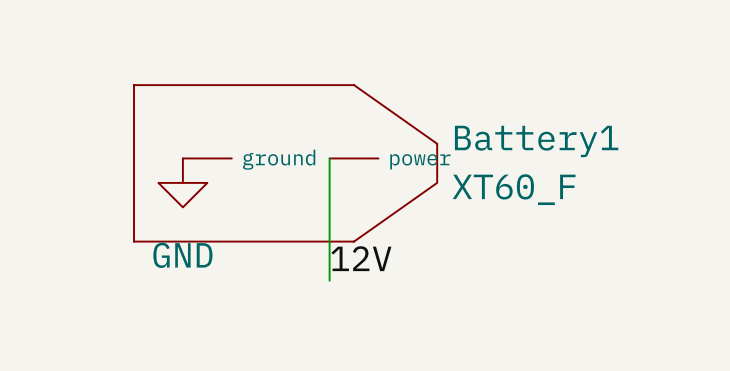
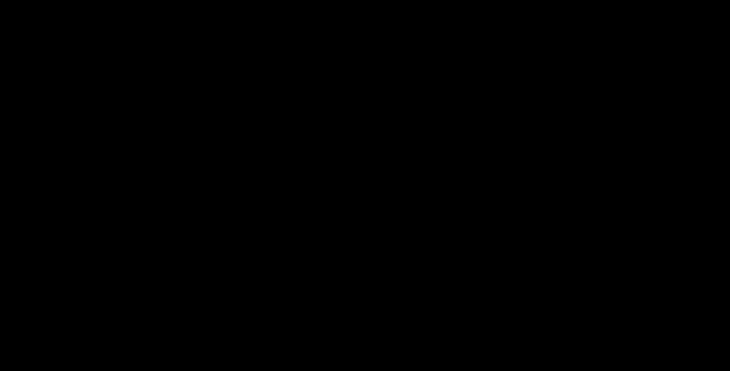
wire: (329, 158) (329, 280) -> none
Battery1: XT60_F (261, 163) -> none
power symbol: GND (182, 182) -> none
label: 12V (361, 258) -> none

